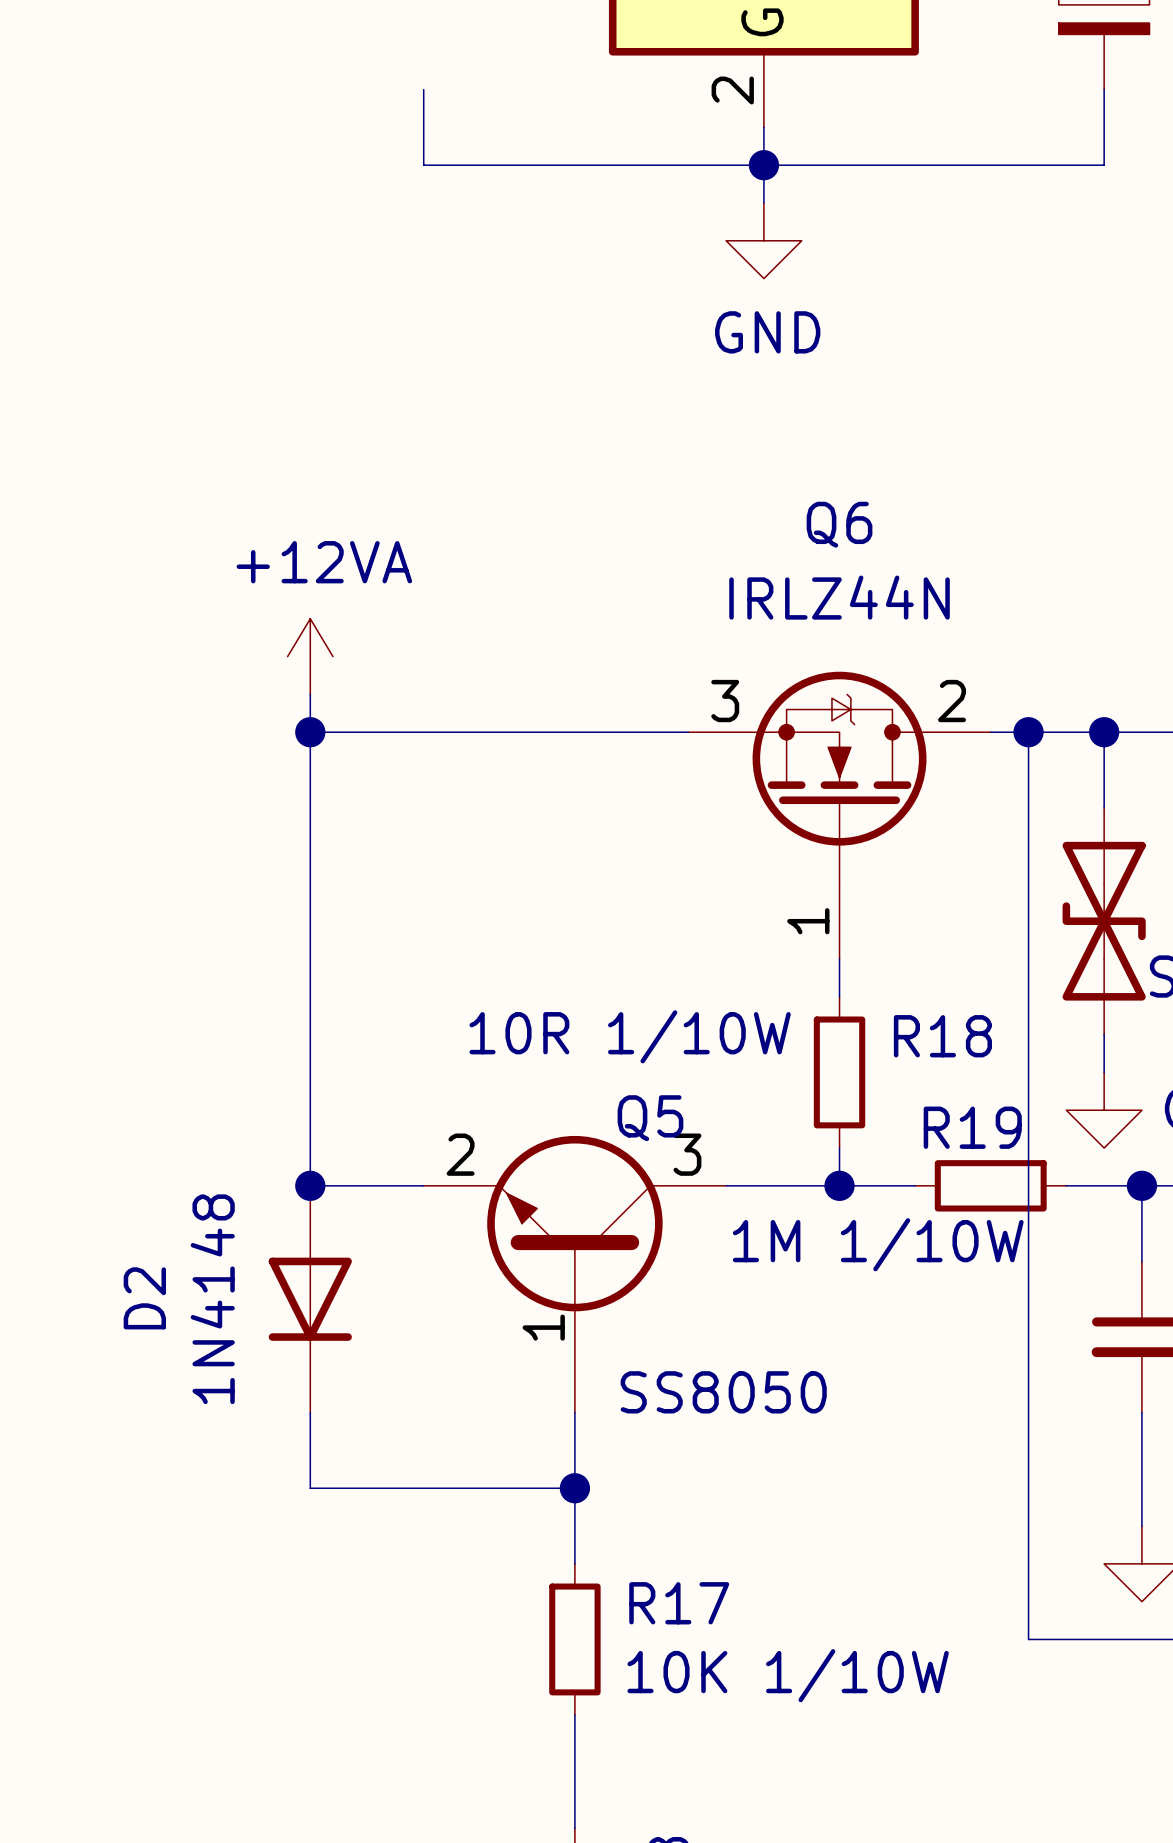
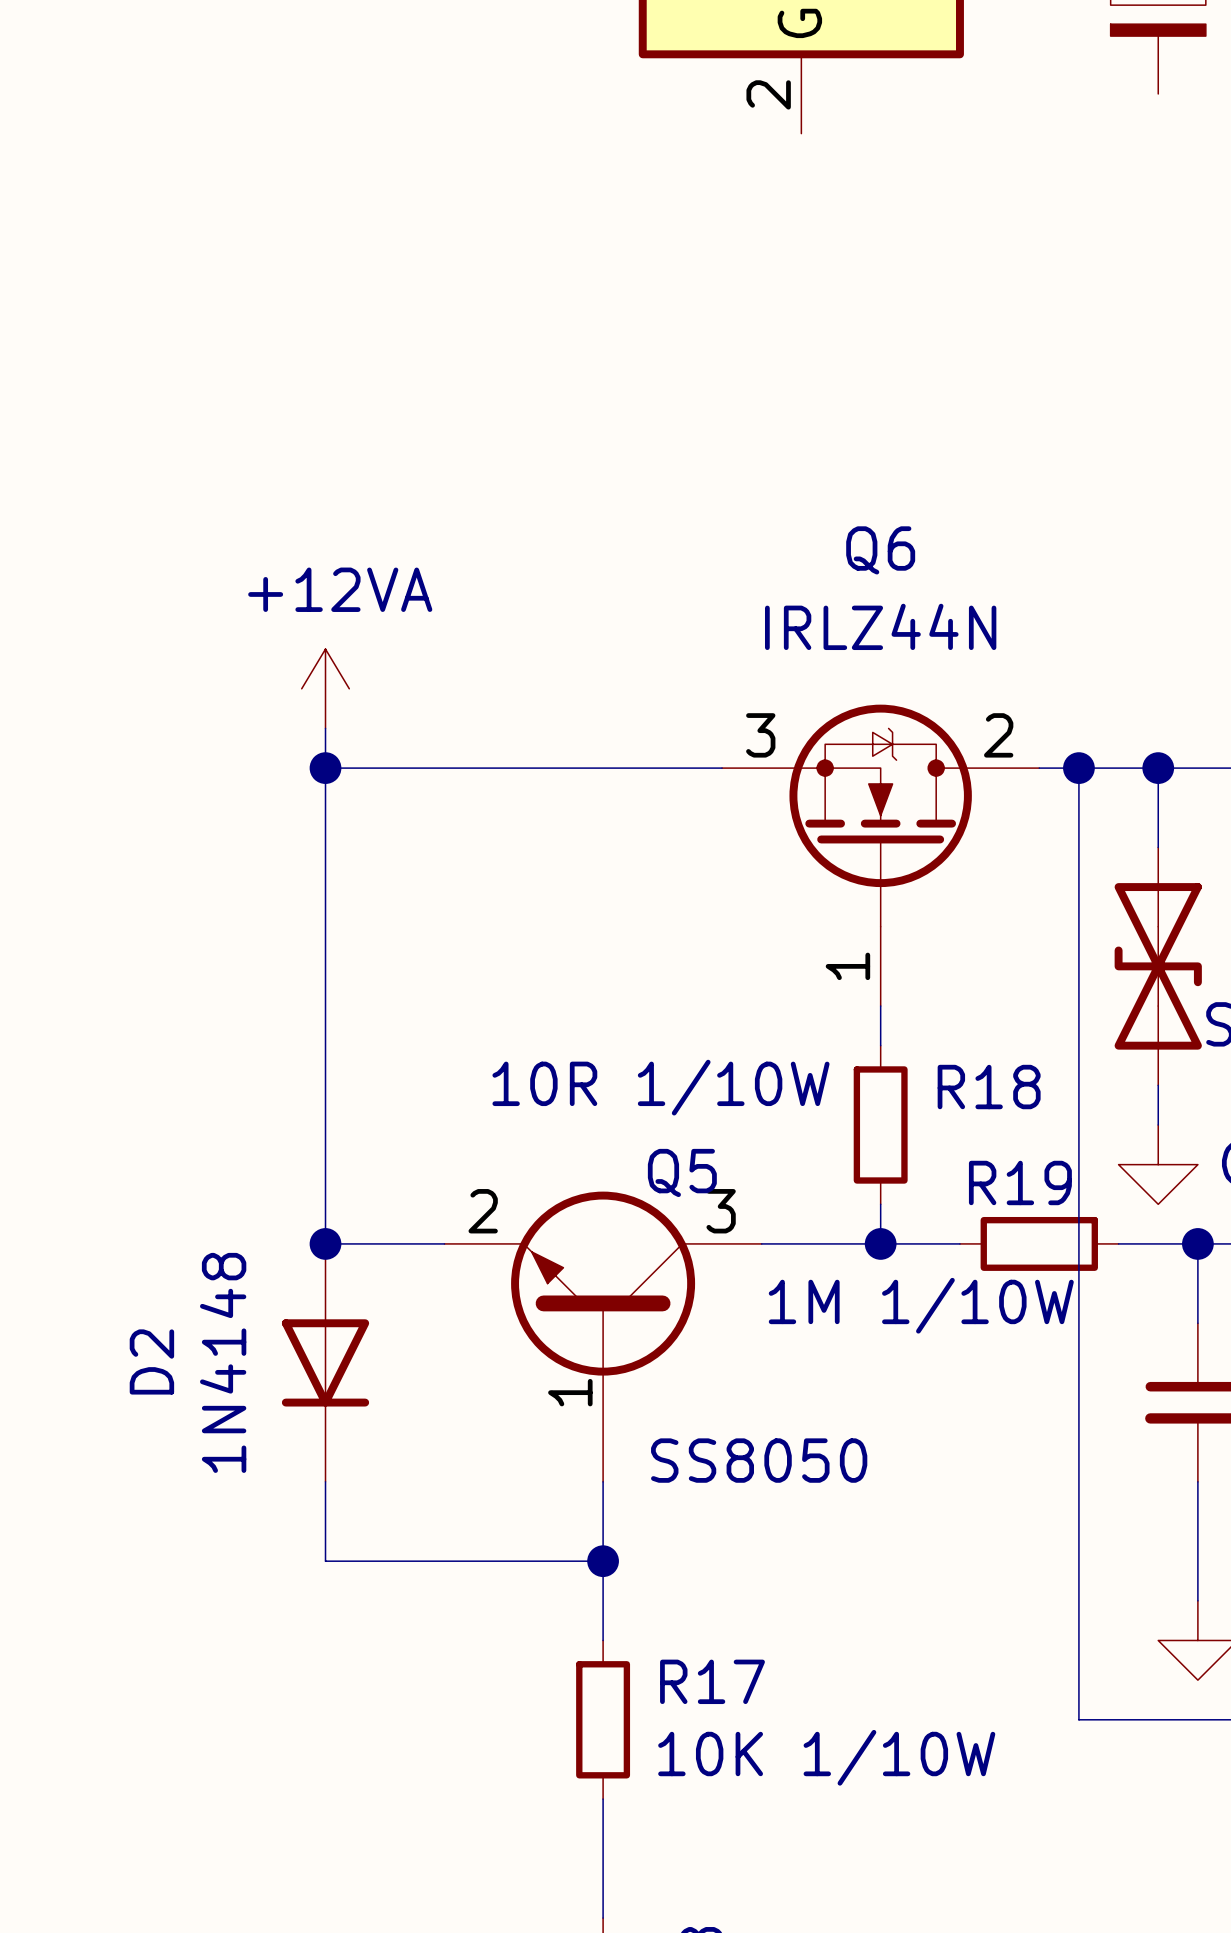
wire: (423, 89) (423, 165) (1104, 165) (1104, 89) -> none
wire: (763, 127) (763, 202) -> none
junction: (763, 165) -> none
power symbol: GND (763, 240) -> none

